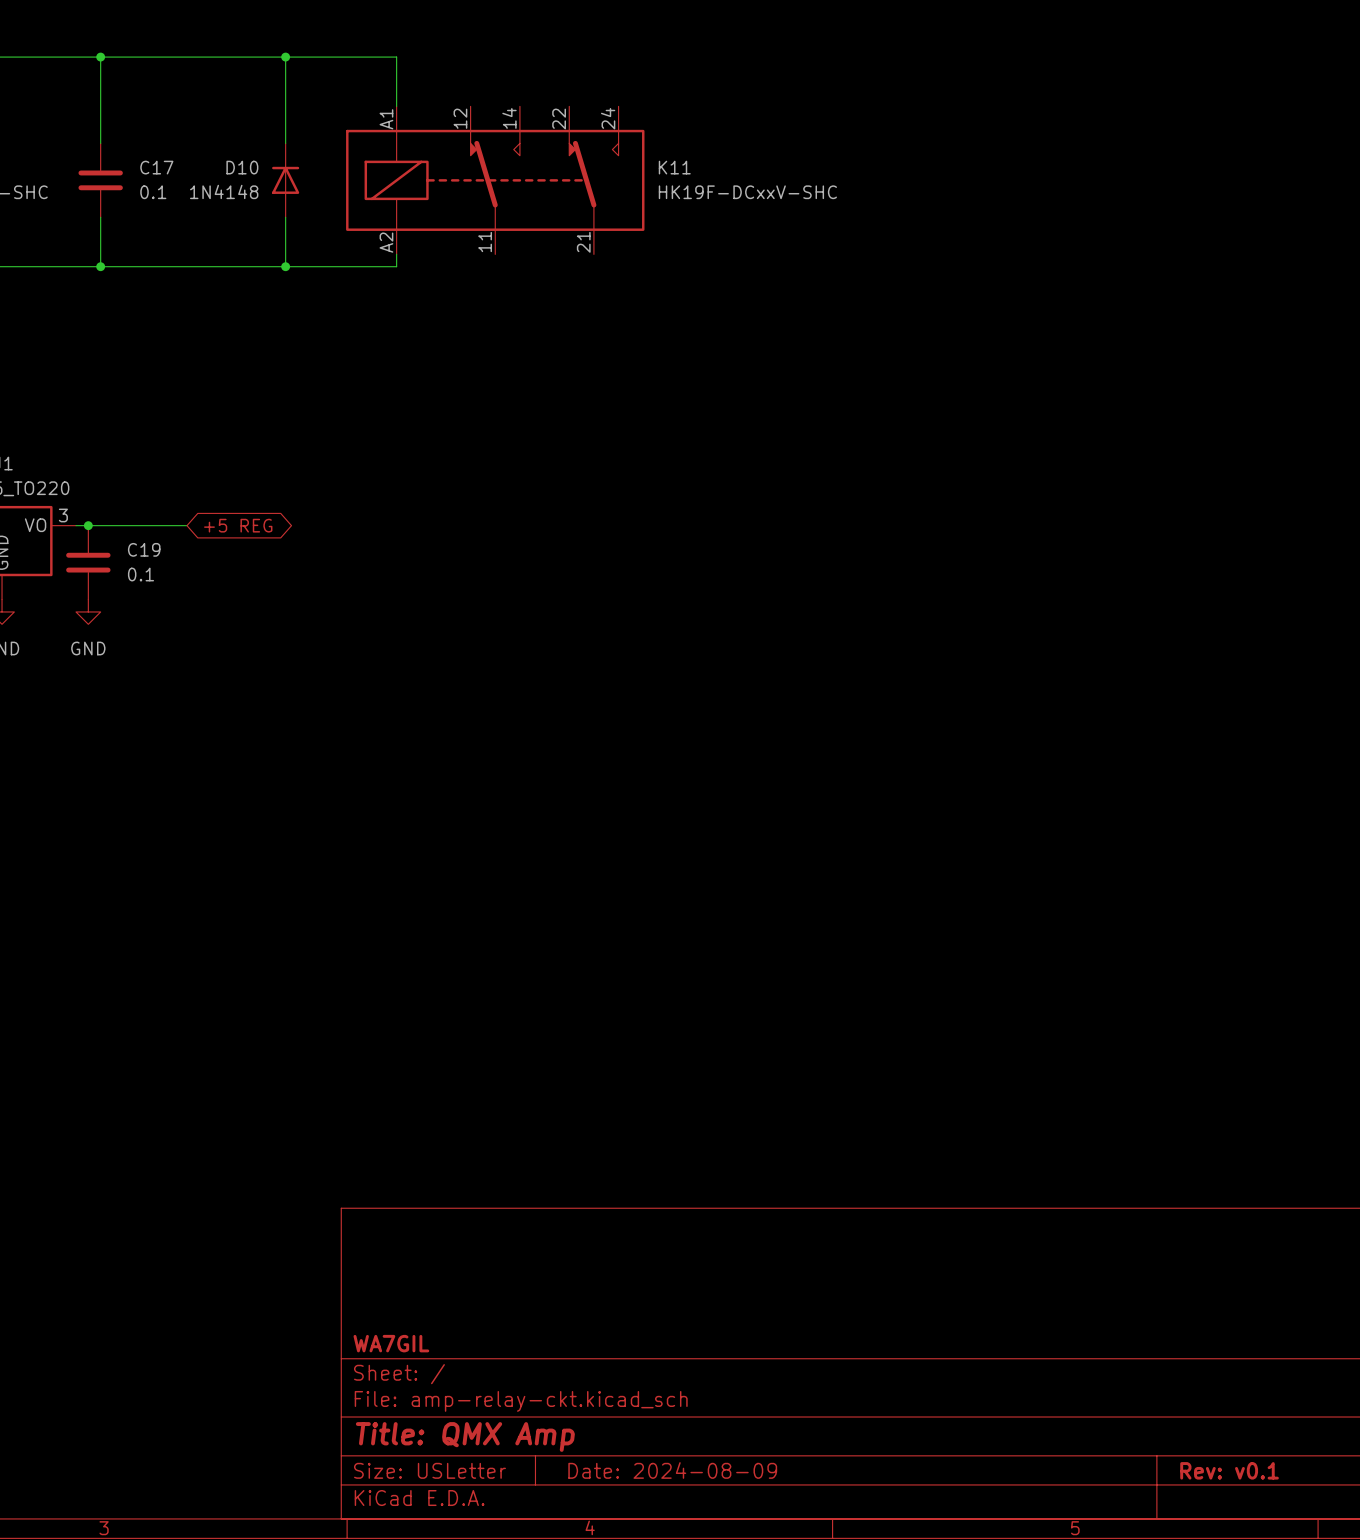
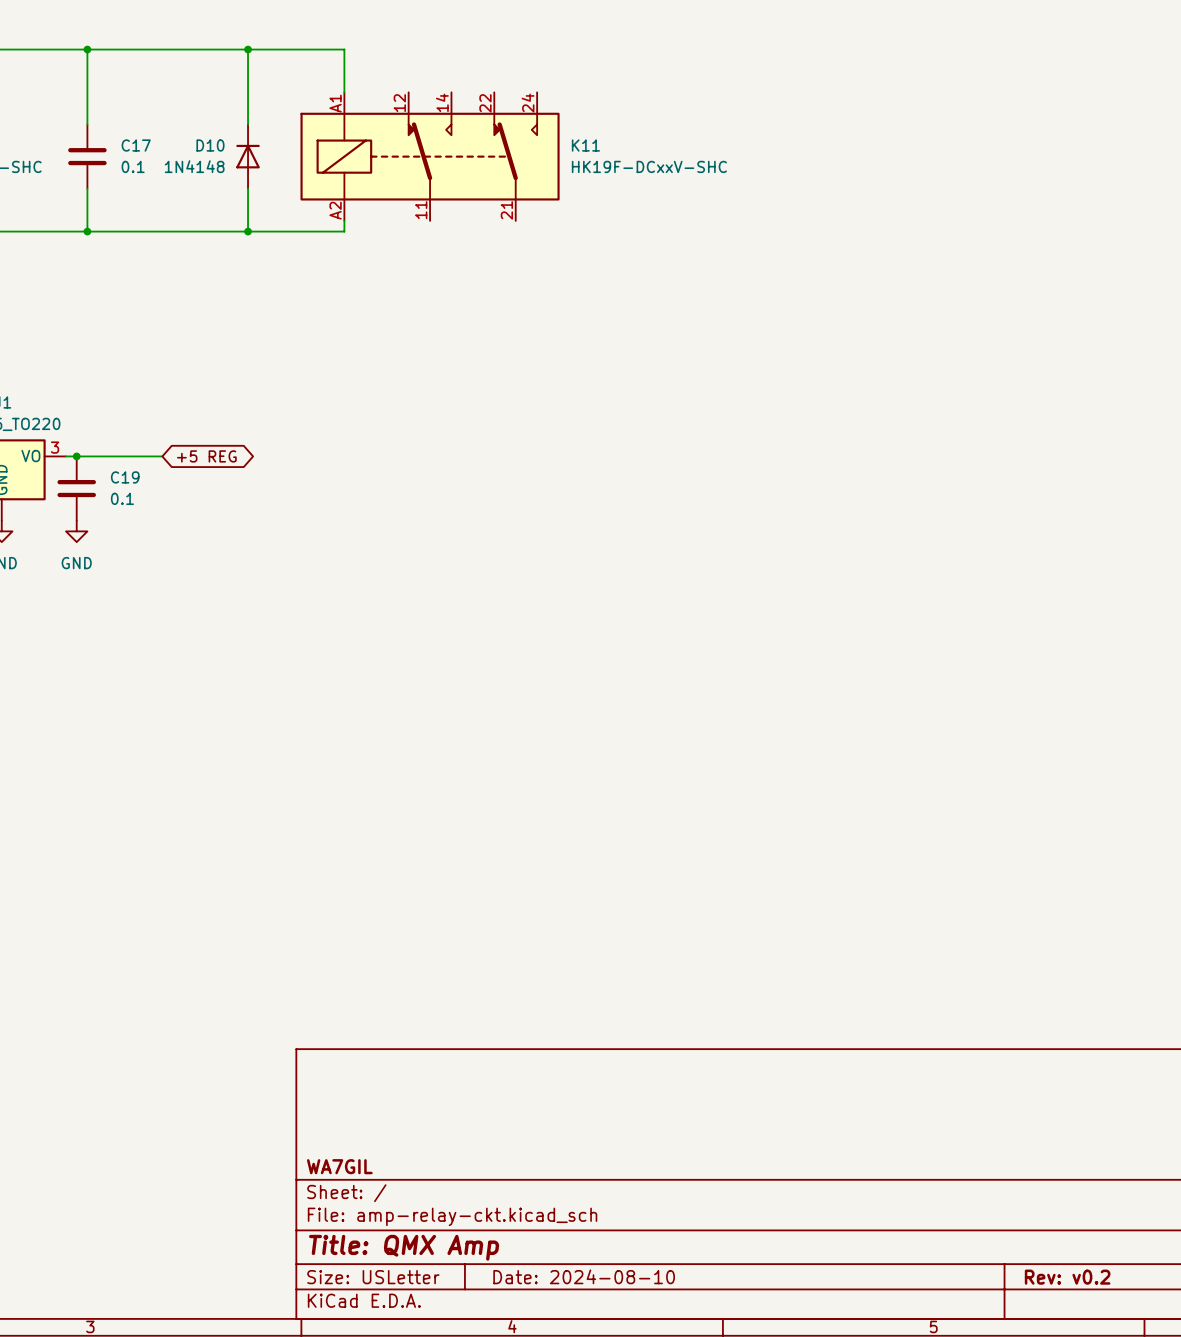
title block: Date: 2024-08-09 (672, 1470) -> Date: 2024-08-10 (584, 1276)
title block: Rev: v0.1 (1229, 1470) -> Rev: v0.2 (1067, 1277)

